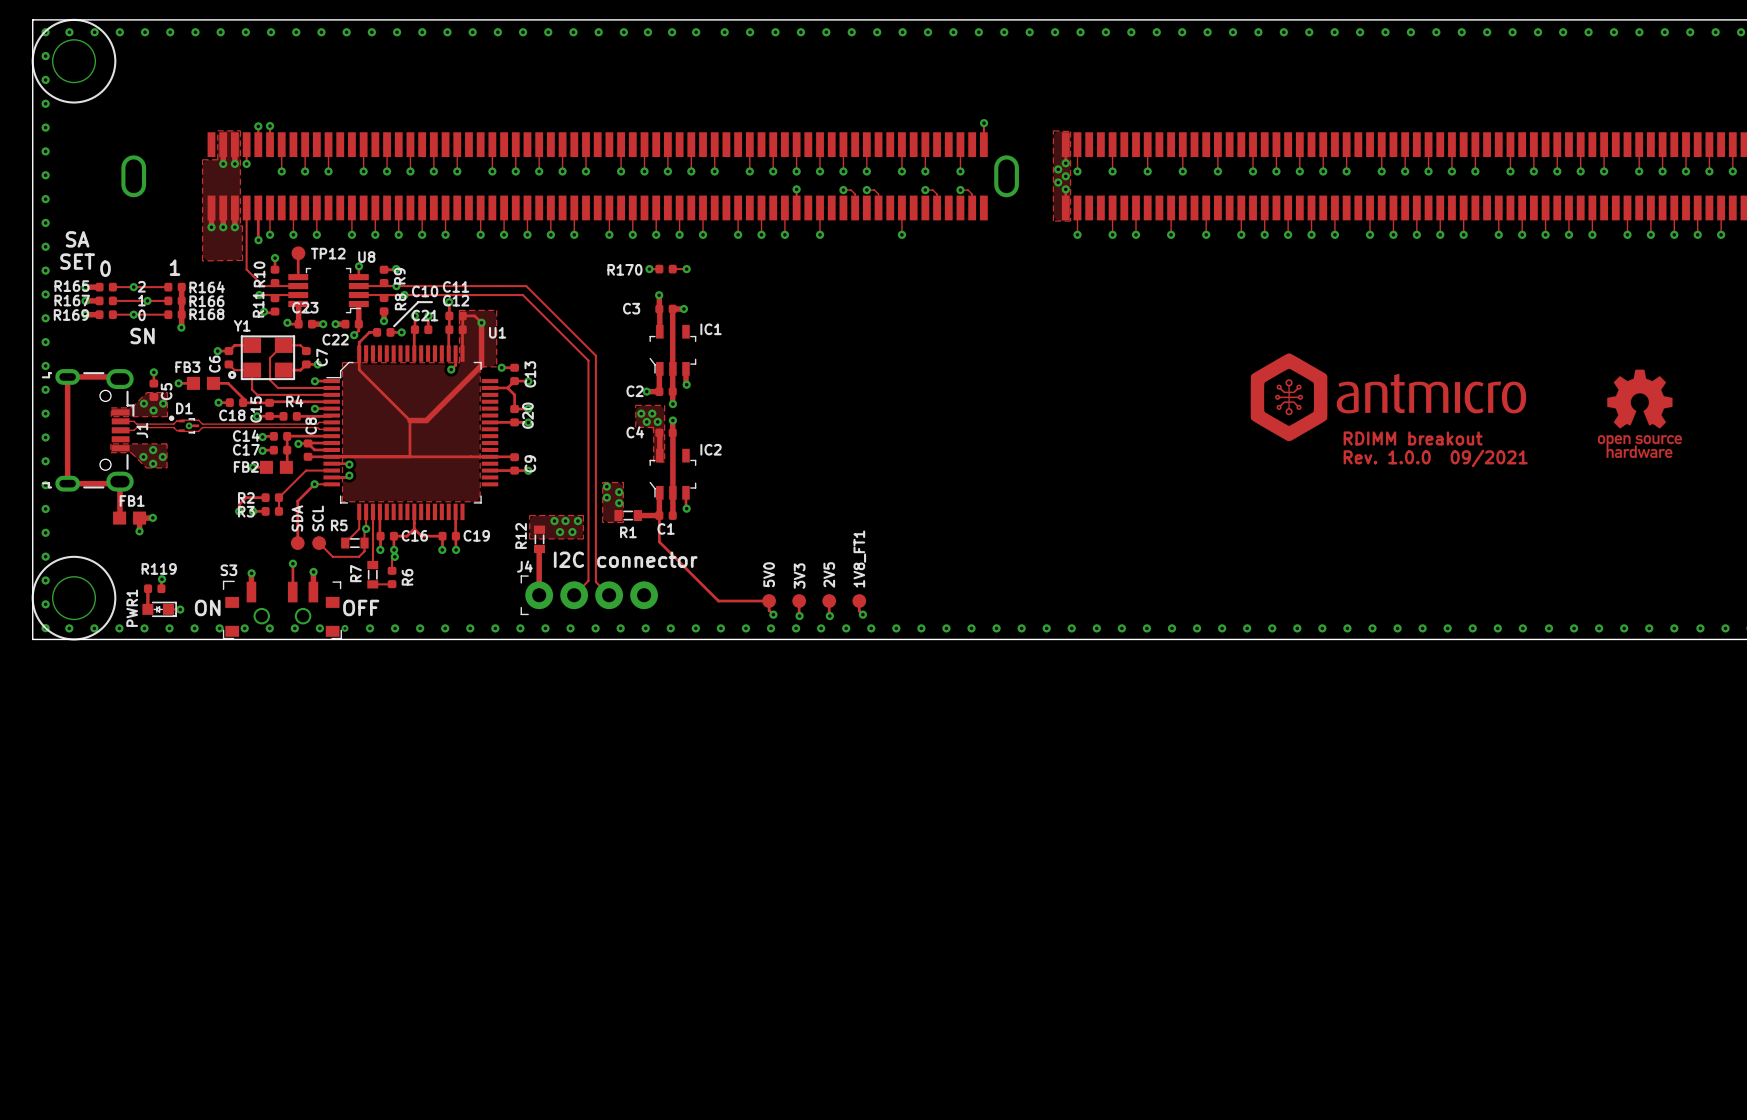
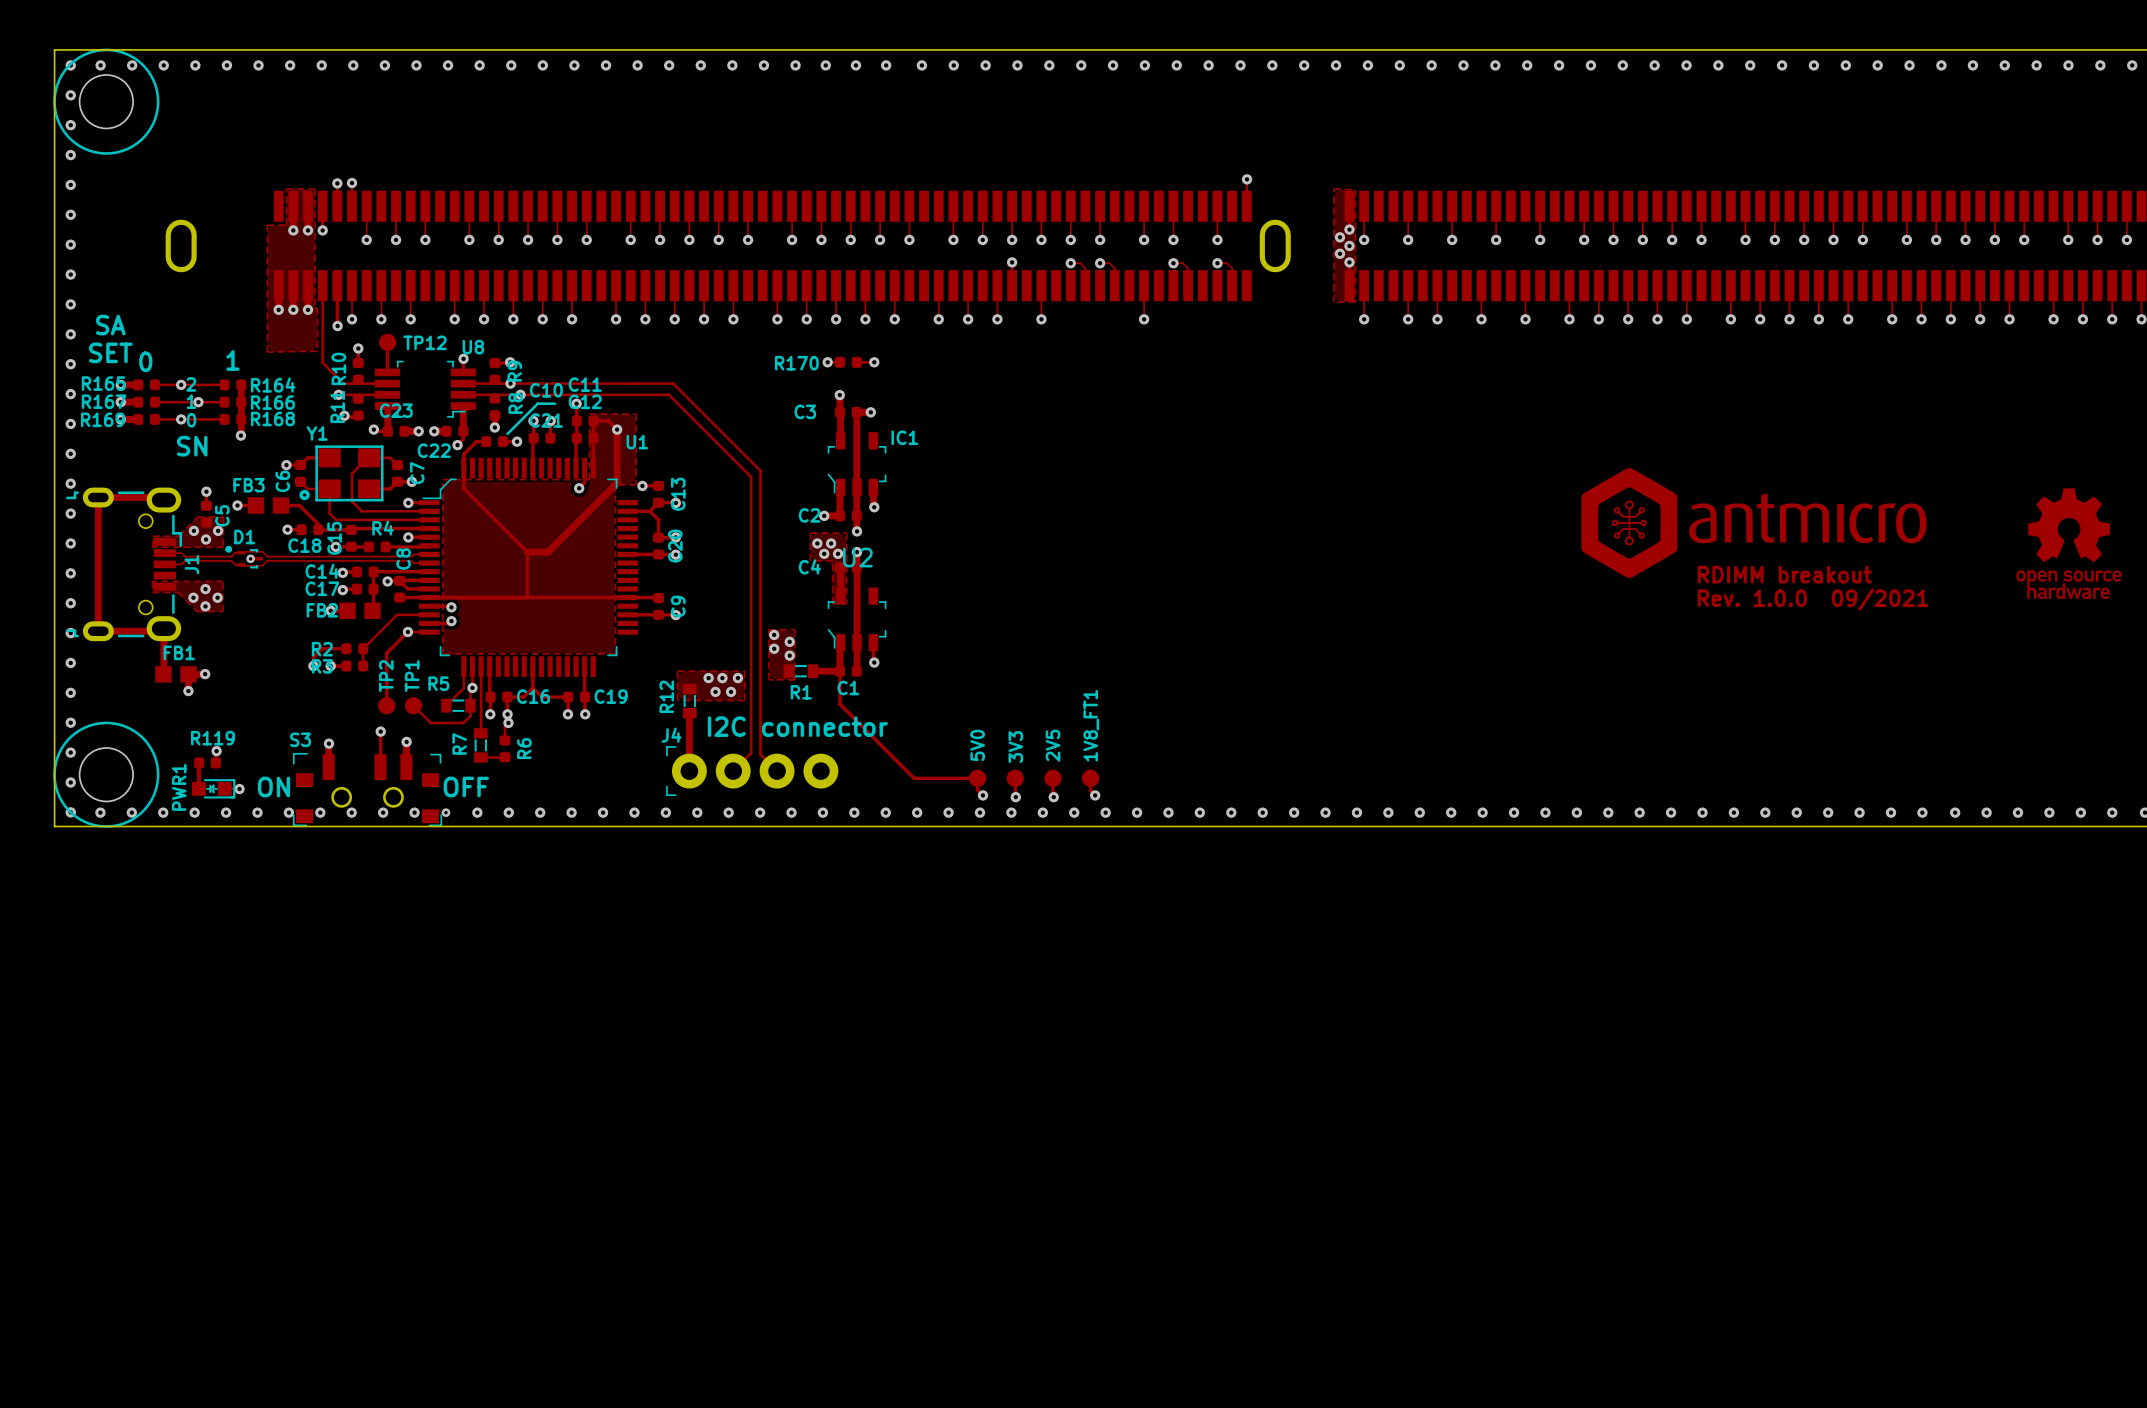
IC2 name: IC2 (711, 449) -> U2 (857, 557)
SDA name: SDA (297, 518) -> TP2 (386, 676)
SCL name: SCL (318, 518) -> TP1 (412, 676)

